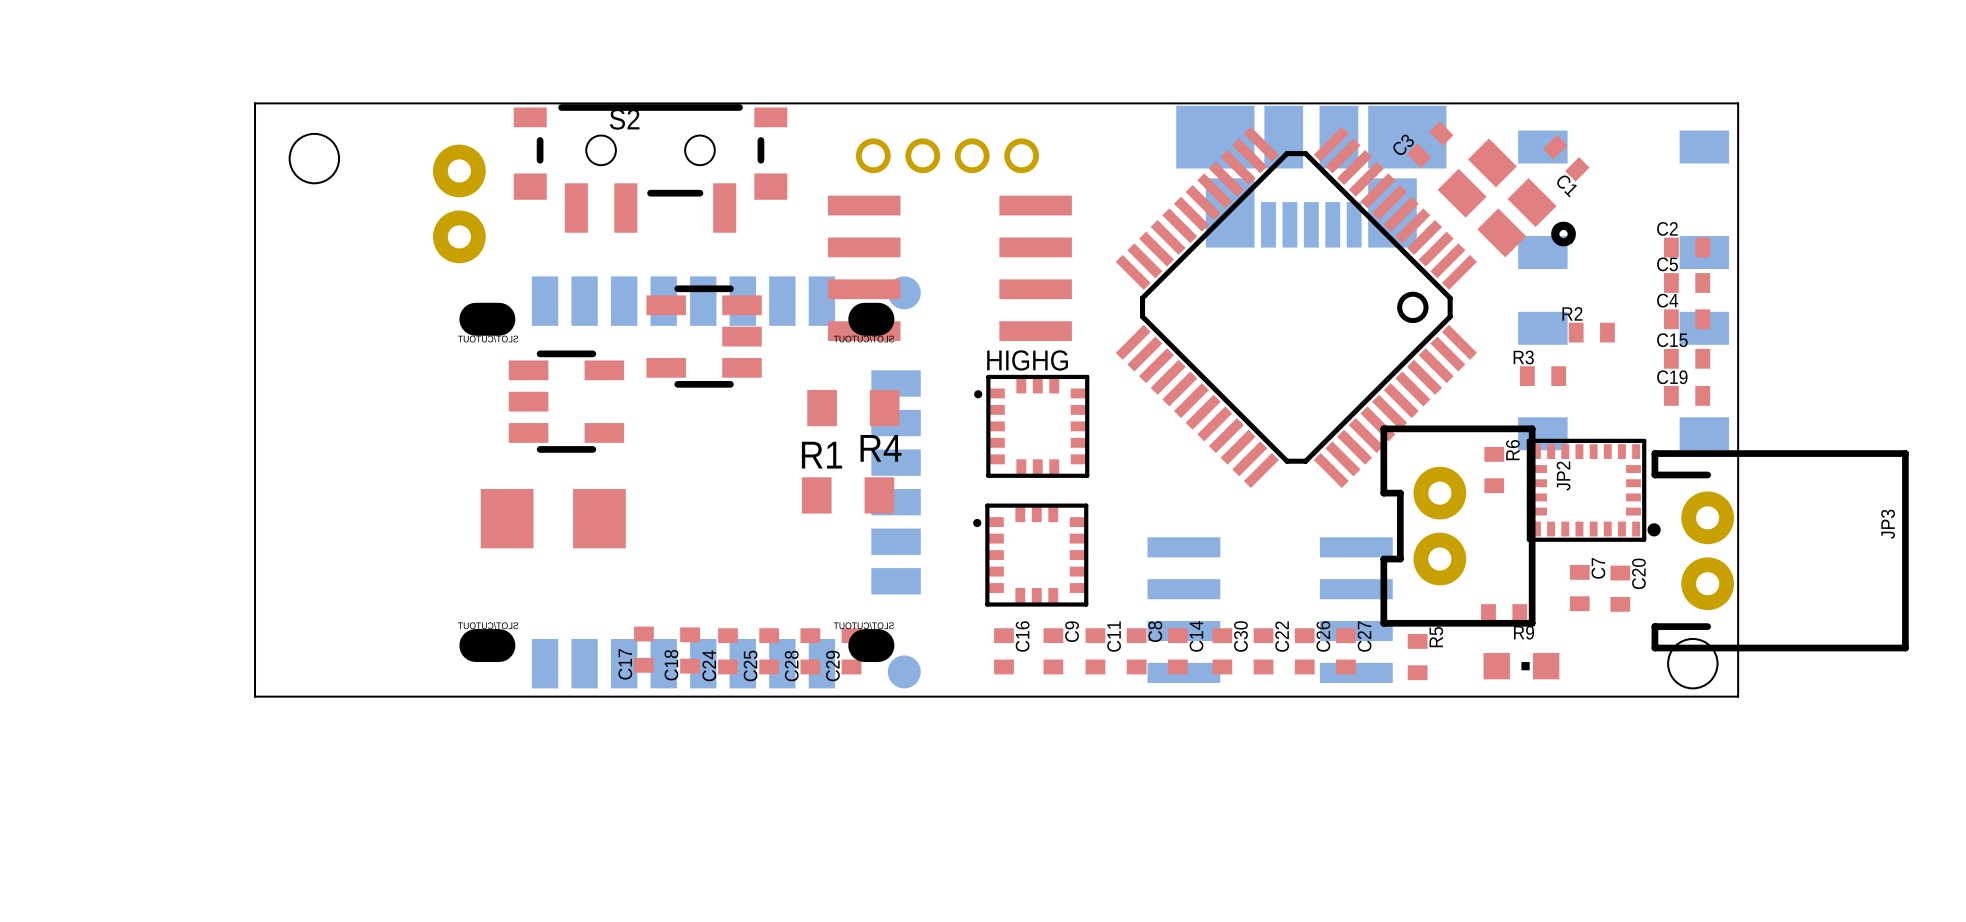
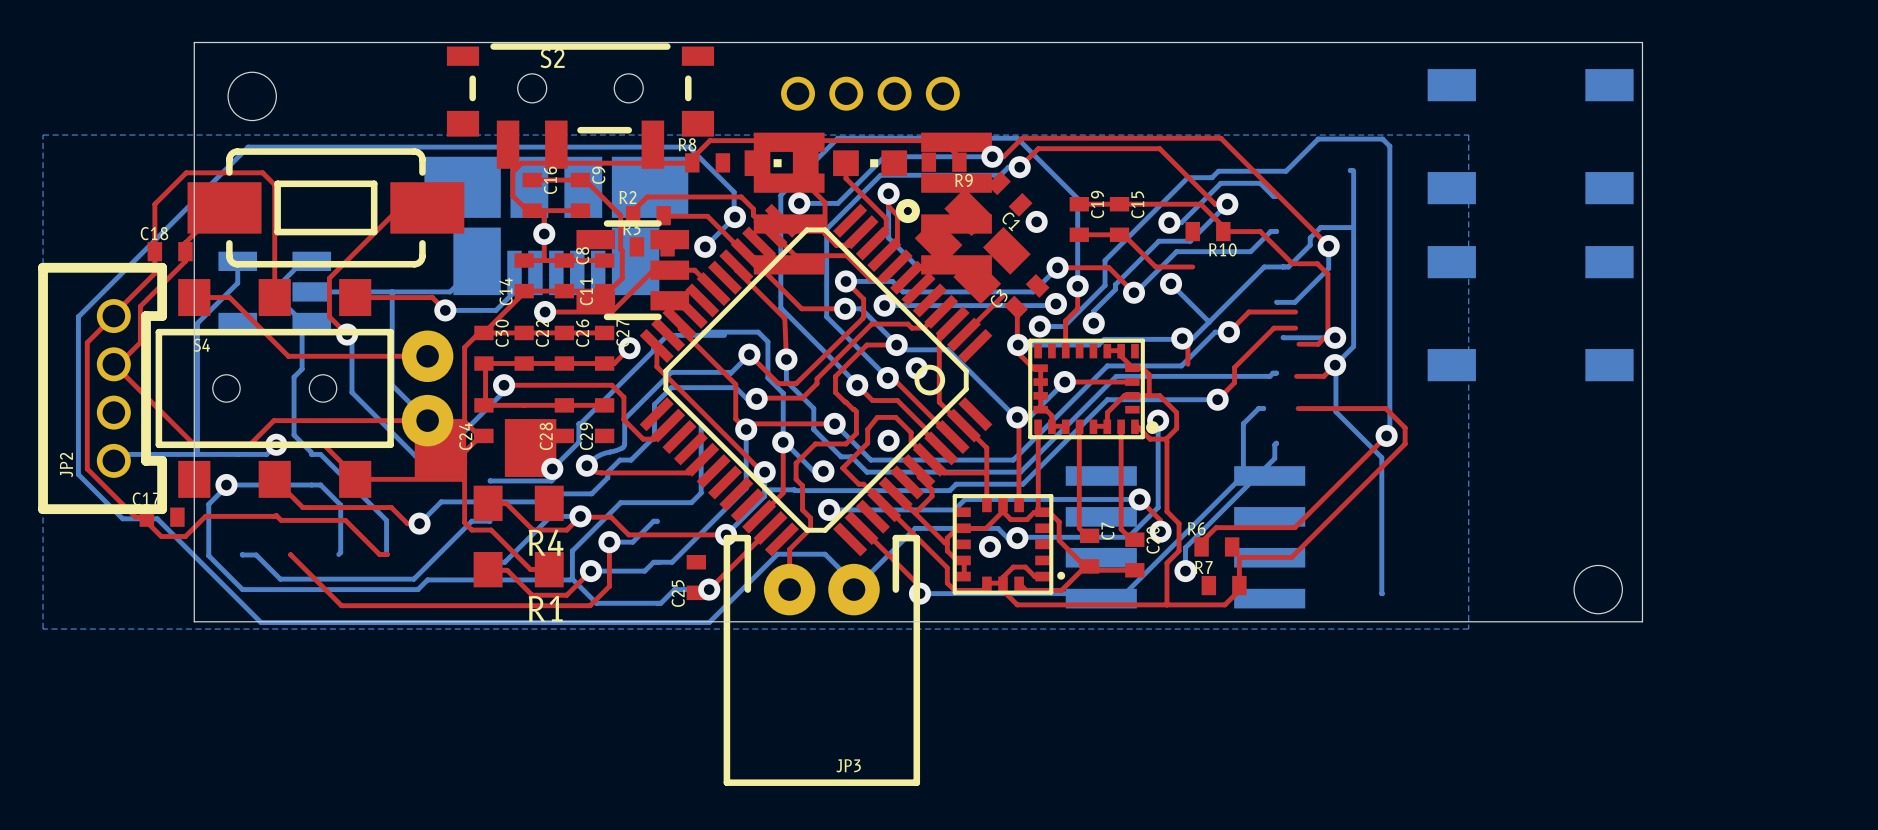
C3 position: (1430, 144) -> (1026, 296)
C1 position: (1566, 158) -> (1009, 194)
part position: (1311, 176) -> (556, 225)
part rotation: 0° (1506, 197) -> 180° (963, 246)
part position: (1506, 197) -> (963, 246)
bottom zone outline: none -> (43, 135) (1468, 135) (1468, 629) (43, 629) (43, 135)
part position: (459, 203) -> (427, 388)
top track: none -> (992, 156) (1003, 156) (1022, 138) (1220, 138) (1328, 246)
bottom track: none -> (992, 156) (884, 156) (837, 203) (799, 203)
via: none -> (992, 156)
top track: none -> (959, 162) (959, 157) (942, 140) (710, 140) (692, 158) (692, 163) (521, 163) (512, 172) (512, 196) (527, 210) (580, 210)
R8: none -> (707, 162)
part: none -> (781, 163)
top track: none -> (805, 163) (805, 183) (825, 202) (825, 233) (836, 245) (848, 245) (861, 232)
top track: none -> (845, 163) (845, 178) (886, 218) (886, 229) (872, 243)
part: none -> (870, 163)
top track: none -> (1019, 167) (1038, 148) (1159, 148) (1215, 204) (1227, 204)
bottom track: none -> (1019, 167) (1008, 167) (1000, 175) (880, 175) (826, 229) (826, 316) (887, 378)
via: none -> (1019, 167)
bottom track: none -> (1350, 170) (1353, 171) (1353, 346) (1335, 365) (1335, 411) (1381, 457) (1382, 593)
top track: none -> (532, 180) (585, 180) (620, 215) (622, 278) (609, 291) (524, 291)
C2: (1687, 247) -> none
top track: none -> (888, 193) (888, 206) (897, 215) (897, 242) (884, 254)
bottom track: none -> (888, 193) (888, 238) (916, 266) (919, 266)
via: none -> (888, 193)
bottom track: none -> (1276, 196) (1273, 196) (1260, 183) (1220, 183) (1181, 222) (1169, 222)
via: none -> (799, 203)
top track: none -> (1079, 204) (1200, 204) (1223, 226) (1223, 231) (1260, 231) (1292, 263) (1295, 263)
bottom track: none -> (1227, 204) (1190, 241) (1158, 241) (1115, 284) (1115, 289) (1093, 311) (1093, 323)
via: none -> (1227, 204)
part: none -> (325, 207)
top track: none -> (224, 208) (220, 208) (185, 242) (185, 261) (140, 306) (140, 342) (117, 365) (113, 364) (194, 444) (250, 443) (273, 420) (427, 420)
top track: none -> (426, 208) (399, 208) (329, 278) (329, 316) (347, 334)
top track: none -> (544, 210) (544, 260)
top track: none -> (633, 215) (632, 211) (647, 196) (741, 196) (753, 209) (753, 215) (795, 255) (846, 255) (870, 279) (882, 279) (895, 266)
top track: none -> (663, 215) (707, 216) (801, 308) (845, 308)
via: none -> (734, 217)
C5: (1687, 283) -> none
via: none -> (1036, 221)
via: none -> (1169, 222)
bottom track: none -> (1353, 227) (1320, 227) (1310, 238) (1310, 245) (1288, 266) (1264, 266) (1192, 338) (1104, 339) (1098, 345) (1018, 345)
R10: none -> (1208, 231)
bottom track: none -> (1276, 231) (1270, 231) (1250, 251) (1176, 251) (1134, 292)
via: none -> (544, 233)
top track: none -> (1079, 234) (1123, 234) (1155, 266) (1192, 266)
part position: (1296, 307) -> (816, 380)
bottom track: none -> (1328, 246) (1328, 268) (1294, 302) (1276, 302)
via: none -> (1328, 246)
bottom track: none -> (705, 246) (734, 217) (734, 192) (689, 147) (248, 147) (78, 316) (78, 474) (122, 518) (157, 518) (261, 622) (709, 622) (777, 554) (825, 554) (855, 584) (854, 589) (915, 528) (998, 528) (1007, 538) (1128, 537) (1158, 507) (1158, 420)
via: none -> (705, 246)
C4: (1687, 319) -> none
top track: none -> (524, 260) (604, 260)
bottom track: none -> (237, 261) (237, 283) (197, 323) (197, 454)
bottom track: none -> (311, 261) (302, 261) (282, 281) (282, 302) (302, 322) (311, 322) (302, 324) (302, 369) (294, 377) (294, 435) (311, 454) (320, 454) (386, 520) (386, 554)
bottom track: none -> (477, 261) (477, 264) (450, 291) (311, 291)
top track: none -> (1298, 263) (1317, 263) (1327, 274) (1327, 335) (1335, 337) (1324, 337) (1318, 344) (1298, 344)
top track: none -> (736, 266) (736, 270) (784, 318) (786, 359)
R2 position: (1591, 332) -> (648, 215)
top track: none -> (1057, 267) (1109, 267) (1134, 292)
bottom track: none -> (1057, 267) (1033, 291) (903, 291) (892, 281) (845, 281)
via: none -> (1057, 267)
bottom track: none -> (514, 272) (514, 291) (496, 310) (445, 310)
top track: none -> (845, 281) (863, 299) (863, 316) (796, 383) (778, 383) (749, 354)
via: none -> (845, 281)
bottom track: none -> (1171, 283) (1209, 322)
via: none -> (1171, 283)
top track: none -> (1077, 286) (1077, 308) (1065, 320) (1065, 350)
bottom track: none -> (1077, 286) (1077, 198) (1017, 138) (837, 138) (780, 195) (780, 308) (857, 385)
via: none -> (1077, 286)
top track: none -> (713, 289) (694, 270) (653, 270) (611, 312) (545, 312)
top track: none -> (525, 291) (483, 332)
bottom track: none -> (392, 291) (392, 385) (427, 420)
C15 rotation: 0° (1687, 358) -> 90° clockwise (1119, 219)
C15 position: (1687, 358) -> (1119, 219)
via: none -> (1134, 292)
top track: none -> (1003, 295) (964, 334)
top track: none -> (194, 297) (229, 297) (288, 356) (427, 356)
top track: none -> (274, 297) (274, 184) (262, 172) (186, 172) (154, 204) (154, 273) (87, 342) (87, 468) (135, 517) (146, 517) (146, 522) (161, 536) (185, 536) (205, 516) (276, 515) (281, 520) (345, 520) (379, 554) (387, 554)
top track: none -> (355, 297) (432, 297) (445, 310)
bottom track: none -> (1055, 303) (1054, 305) (884, 305)
via: none -> (1055, 303)
via: none -> (884, 305)
top track: none -> (1016, 307) (1017, 352) (1033, 368) (1040, 368) (1040, 409) (1045, 409) (1051, 415) (1051, 426) (1065, 426)
bottom track: none -> (845, 308) (861, 308) (902, 349) (948, 349) (1017, 417) (1029, 417) (1064, 382)
via: none -> (845, 308)
R3 position: (1543, 376) -> (652, 246)
via: none -> (445, 310)
via: none -> (545, 312)
top track: none -> (941, 311) (924, 328) (911, 328) (907, 324) (871, 324) (817, 378) (817, 383) (802, 398) (756, 398)
top track: none -> (1295, 312) (1249, 312) (1228, 332)
top track: none -> (679, 323) (680, 328) (735, 384) (735, 419) (746, 429) (743, 423) (834, 423)
top track: none -> (952, 323) (939, 336) (939, 402) (963, 425)
via: none -> (1093, 323)
bottom track: none -> (1039, 326) (1064, 326) (1105, 285) (1105, 260) (1187, 177) (1212, 177) (1218, 171) (1286, 171) (1318, 139) (1382, 139) (1389, 146) (1389, 432) (1386, 435)
via: none -> (1039, 326)
top track: none -> (1295, 328) (1273, 328) (1234, 367) (1234, 382) (1217, 399)
C19 rotation: 0° (1687, 395) -> 90° clockwise (1079, 219)
C19 position: (1687, 395) -> (1079, 219)
top track: none -> (604, 332) (479, 332) (464, 347) (464, 421) (476, 433) (476, 436) (483, 435) (481, 435) (464, 452) (464, 522) (471, 530) (491, 530) (530, 569) (549, 569)
bottom track: none -> (1228, 332) (1215, 332) (1181, 365) (1107, 365) (1013, 460) (870, 460) (834, 423)
via: none -> (1228, 332)
part side: top (566, 401) -> bottom (274, 291)
bottom track: none -> (347, 334) (351, 339) (351, 392) (415, 456) (439, 456) (504, 391) (504, 385)
via: none -> (347, 334)
bottom track: none -> (701, 335) (704, 332) (758, 332) (767, 341) (767, 378) (783, 393) (783, 442) (819, 476) (823, 471)
bottom track: none -> (724, 335) (667, 335) (578, 423) (578, 442) (552, 468) (557, 474) (551, 480) (490, 480)
bottom track: none -> (1283, 337) (1335, 337)
via: none -> (1335, 337)
top track: none -> (1182, 338) (1187, 344) (1187, 364)
via: none -> (1182, 338)
R4 position: (853, 408) -> (518, 503)
top track: none -> (896, 345) (866, 345) (835, 376) (835, 392) (856, 411) (856, 433) (845, 443) (815, 443) (796, 463) (796, 479) (802, 485) (802, 509) (810, 517) (810, 528) (789, 549) (789, 589)
via: none -> (896, 345)
via: none -> (1018, 345)
top track: none -> (656, 345) (656, 366) (762, 472) (764, 472)
top track: none -> (629, 348) (614, 363) (483, 363) (485, 365) (485, 402) (483, 405) (604, 405)
via: none -> (629, 348)
top track: none -> (1107, 350) (1121, 351) (1121, 356) (1132, 368) (1142, 368) (1149, 374) (1149, 395)
bottom track: none -> (749, 354) (730, 373) (671, 372) (624, 419) (623, 447) (597, 456) (586, 465)
via: none -> (749, 354)
JP2 footprint: [1380, 425, 1536, 627] -> [38, 262, 168, 515]
HIGHG: (1031, 426) -> none
bottom track: none -> (786, 359) (786, 382) (813, 408) (813, 429) (841, 456) (851, 456) (866, 472) (1020, 472) (1116, 376) (1269, 376) (1276, 373)
via: none -> (786, 359)
top track: none -> (1335, 365) (1323, 376) (1296, 376)
via: none -> (1335, 365)
via: none -> (916, 368)
top track: none -> (887, 378) (892, 378) (952, 436)
via: none -> (887, 378)
top track: none -> (1064, 382) (1132, 382)
via: none -> (1064, 382)
top track: none -> (504, 385) (611, 385) (623, 397) (623, 419) (643, 439) (654, 439) (668, 425)
via: none -> (504, 385)
top track: none -> (857, 385) (872, 400) (897, 400) (925, 428) (925, 432) (940, 448)
via: none -> (857, 385)
R1 name position: R1 (822, 455) -> R1 (545, 608)
S4: none -> (274, 388)
top track: none -> (1132, 395) (1124, 395) (1107, 412) (1107, 426) (1093, 426)
top track: none -> (1132, 395) (1159, 395) (1176, 412) (1176, 428) (1166, 439)
bottom track: none -> (756, 398) (747, 398) (735, 387) (671, 387) (654, 404) (654, 436) (631, 460) (619, 460) (607, 472) (607, 477) (591, 493) (553, 493) (545, 501) (441, 501) (419, 523)
via: none -> (756, 398)
bottom track: none -> (1217, 399) (1107, 399) (1022, 484) (956, 484) (949, 490) (764, 489)
via: none -> (1217, 399)
R6 rotation: 0° (1494, 470) -> 90° clockwise (1216, 546)
R6 position: (1494, 470) -> (1216, 546)
JP2 name position: JP2 (1563, 476) -> JP2 (66, 465)
bottom track: none -> (1263, 408) (1258, 408) (1243, 423) (1243, 475) (1125, 593) (919, 593)
top track: none -> (1298, 408) (1385, 408) (1405, 427) (1405, 443) (1291, 557) (1239, 558) (1238, 591) (1224, 604) (1017, 604) (1002, 590) (1003, 583)
part: (690, 482) -> none
top track: none -> (1017, 417) (1018, 419) (1019, 504)
via: none -> (1017, 417)
via: none -> (1158, 420)
part position: (1593, 490) -> (1093, 388)
via: none -> (834, 423)
bottom track: none -> (701, 425) (701, 493) (691, 502) (620, 502) (572, 550) (572, 579)
R1 position: (848, 495) -> (518, 569)
top track: none -> (964, 425) (986, 448) (986, 504)
top track: none -> (1038, 426) (1038, 509) (1049, 512) (1059, 522) (1059, 540) (1081, 563) (1081, 567) (1089, 566)
top track: none -> (1121, 426) (1121, 529) (1131, 539) (1134, 539)
top track: none -> (1134, 426) (1138, 427) (1150, 439) (1166, 439)
top track: none -> (1079, 427) (1079, 528) (1086, 535) (1089, 535)
bottom track: none -> (746, 429) (746, 488) (672, 562) (657, 562)
via: none -> (746, 429)
top track: none -> (1386, 435) (1294, 527) (1216, 527) (1201, 542) (1201, 546)
via: none -> (1386, 435)
top track: none -> (1166, 439) (1166, 511) (1179, 523) (1179, 550) (1166, 563) (1166, 604)
via: none -> (888, 440)
top track: none -> (783, 442) (783, 493) (759, 516)
via: none -> (783, 442)
bottom track: none -> (1276, 443) (1274, 444) (1274, 458) (1185, 547) (1185, 571)
top track: none -> (276, 444) (323, 444) (356, 476) (355, 479) (464, 479)
bottom track: none -> (276, 444) (266, 454) (120, 454) (113, 460)
via: none -> (276, 444)
top track: none -> (929, 459) (944, 472) (986, 472)
top track: none -> (701, 460) (689, 472) (599, 472) (586, 465)
top track: none -> (929, 460) (911, 441) (911, 432) (895, 417) (877, 417) (867, 429) (867, 443) (842, 468) (858, 484) (863, 484) (884, 504)
via: none -> (586, 465)
via: none -> (552, 468)
via: none -> (823, 471)
top track: none -> (918, 471) (919, 476) (932, 489) (932, 496) (915, 513)
bottom track: none -> (764, 472) (764, 496) (726, 534)
via: none -> (764, 472)
top track: none -> (274, 479) (302, 507) (391, 507) (407, 523) (419, 523)
JP3 rotation: 0° (1780, 550) -> 90° clockwise (821, 660)
JP3 position: (1780, 550) -> (821, 660)
part rotation: 0° (1030, 555) -> 180° (1008, 544)
part position: (1030, 555) -> (1008, 544)
via: none -> (226, 485)
top track: none -> (895, 493) (944, 542) (947, 542)
top track: none -> (1139, 499) (1160, 520) (1160, 531)
bottom track: none -> (1139, 499) (965, 499) (954, 509) (829, 509)
via: none -> (1139, 499)
top track: none -> (488, 503) (506, 503) (533, 530) (566, 530) (580, 516) (611, 517) (628, 534) (726, 534)
top track: none -> (884, 505) (947, 567) (947, 583) (954, 590) (982, 590) (987, 583) (1003, 583)
via: none -> (829, 509)
top track: none -> (1002, 511) (985, 528) (957, 528) (947, 538) (947, 550) (957, 560) (964, 560) (963, 576)
top track: none -> (1002, 511) (1010, 519) (1026, 519) (1034, 512) (1042, 512)
bottom track: none -> (580, 516) (550, 516) (504, 562) (490, 562)
via: none -> (580, 516)
C7 position: (1579, 588) -> (1089, 551)
C20 position: (1620, 588) -> (1134, 555)
bottom track: none -> (489, 521) (471, 521) (413, 579) (280, 579) (256, 555) (242, 555)
bottom track: none -> (656, 521) (653, 521) (632, 542) (609, 542)
via: none -> (419, 523)
top track: none -> (770, 528) (709, 589)
top track: none -> (862, 528) (919, 586) (919, 593)
via: none -> (1160, 531)
via: none -> (726, 534)
via: none -> (1017, 538)
R9 position: (1504, 614) -> (944, 162)
top track: none -> (609, 542) (609, 586) (590, 605) (341, 605) (290, 555)
via: none -> (609, 542)
via: none -> (989, 546)
bottom track: none -> (338, 554) (340, 552) (340, 505) (320, 485) (226, 485) (208, 504) (208, 555) (242, 589) (417, 589) (427, 579) (572, 579)
bottom track: none -> (656, 562) (653, 562) (644, 571) (590, 571)
C11 name position: C11 (1114, 636) -> C11 (586, 291)
C14 name position: C14 (1196, 636) -> C14 (506, 291)
top track: none -> (1089, 566) (1085, 566) (1061, 590) (1026, 590) (1019, 583)
top track: none -> (1089, 566) (1084, 570) (1134, 570)
top track: none -> (488, 569) (507, 570) (532, 595) (566, 595) (590, 571)
via: none -> (590, 571)
via: none -> (1185, 571)
C17 rotation: 0° (643, 649) -> 90° clockwise (162, 517)
C17 position: (643, 649) -> (162, 517)
C18 rotation: 0° (690, 650) -> 90° clockwise (170, 251)
C18 position: (690, 650) -> (170, 251)
top track: none -> (1042, 576) (1035, 576) (1025, 567) (1013, 567) (1002, 577) (1003, 583)
C24 position: (727, 651) -> (483, 420)
C28 position: (810, 651) -> (564, 420)
C29 position: (851, 651) -> (604, 420)
C16 position: (1004, 651) -> (532, 195)
C9 position: (1053, 651) -> (580, 195)
C11 position: (1095, 651) -> (604, 275)
C8 position: (1136, 651) -> (564, 275)
C14 position: (1177, 651) -> (524, 275)
C30 position: (1222, 651) -> (483, 348)
C22 position: (1263, 651) -> (524, 348)
C26 position: (1304, 651) -> (564, 348)
C27 position: (1345, 651) -> (604, 348)
bottom track: none -> (572, 579) (596, 603) (660, 603) (674, 589) (709, 589)
R5: (1417, 657) -> none
R7: none -> (1224, 585)
via: none -> (709, 589)
part: (1521, 666) -> none
via: none -> (919, 593)

